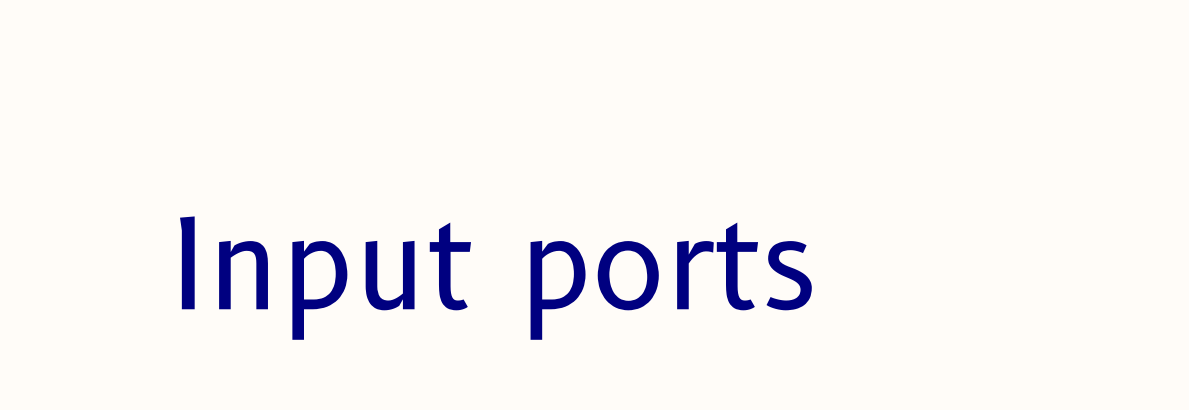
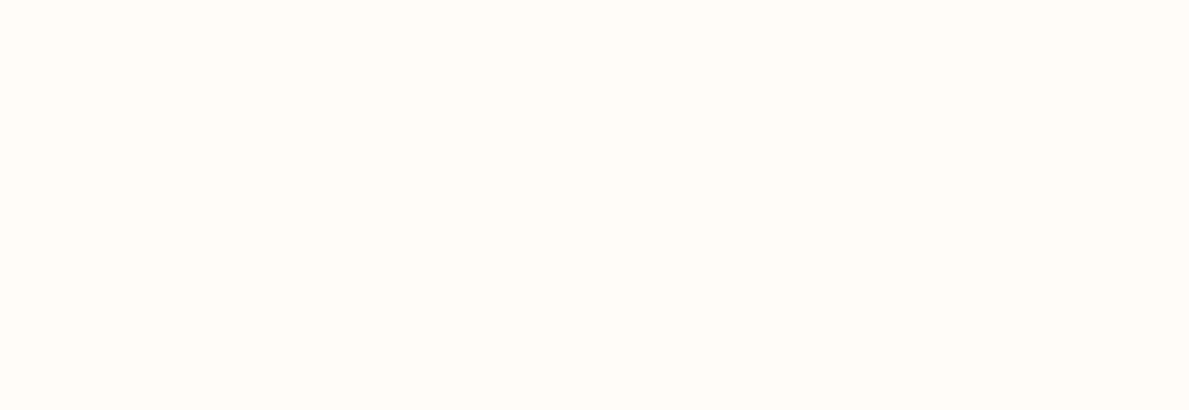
text: Input ports (495, 278) -> none

